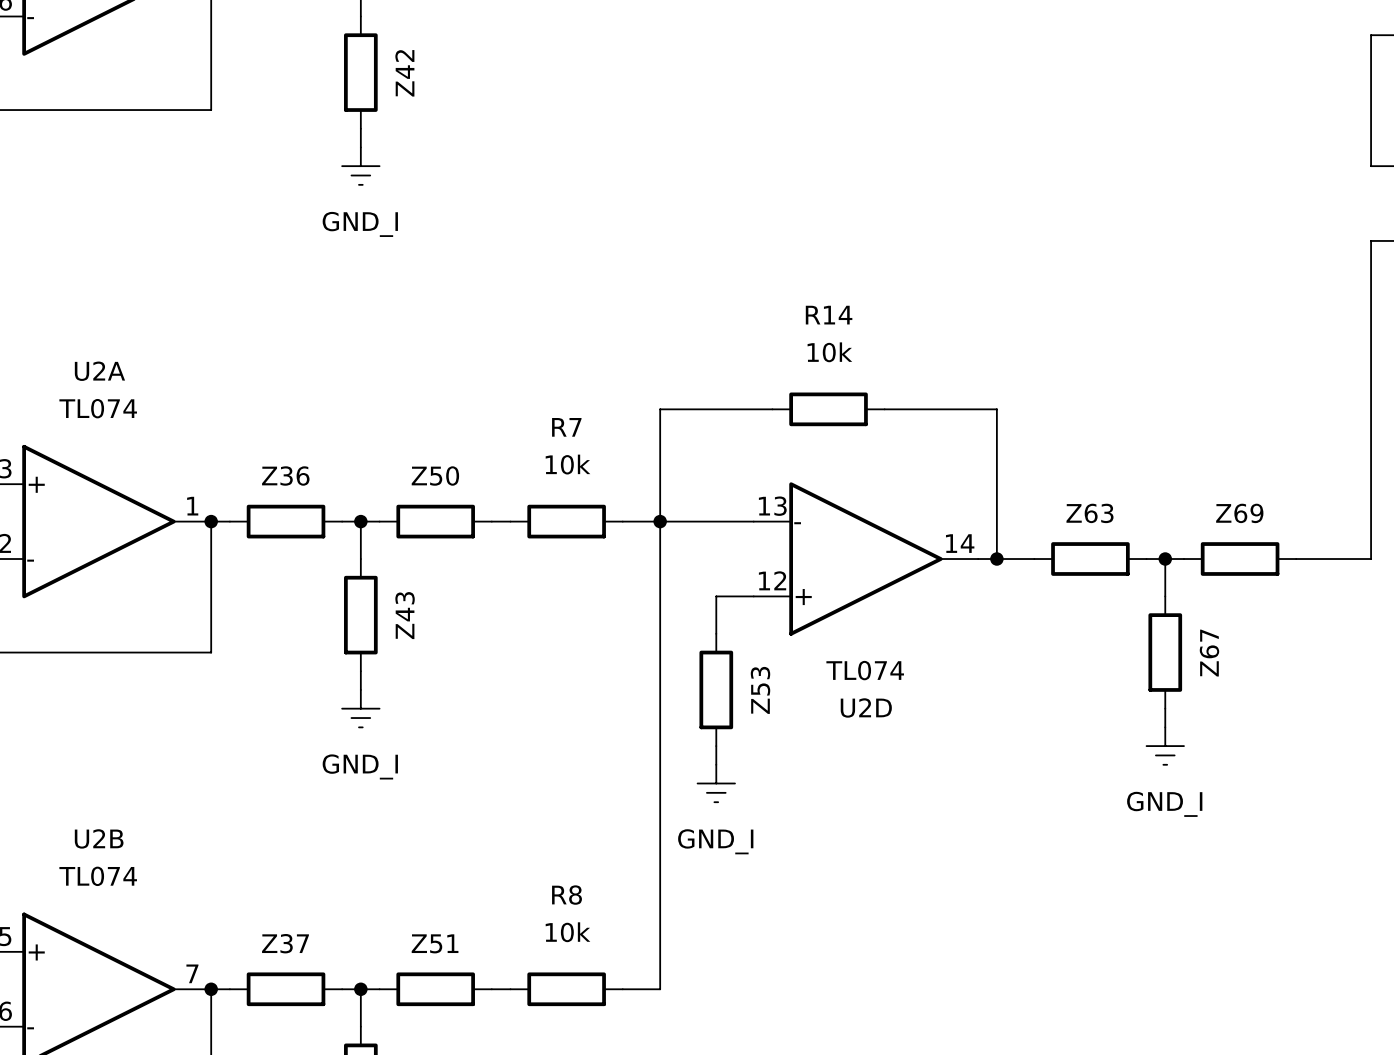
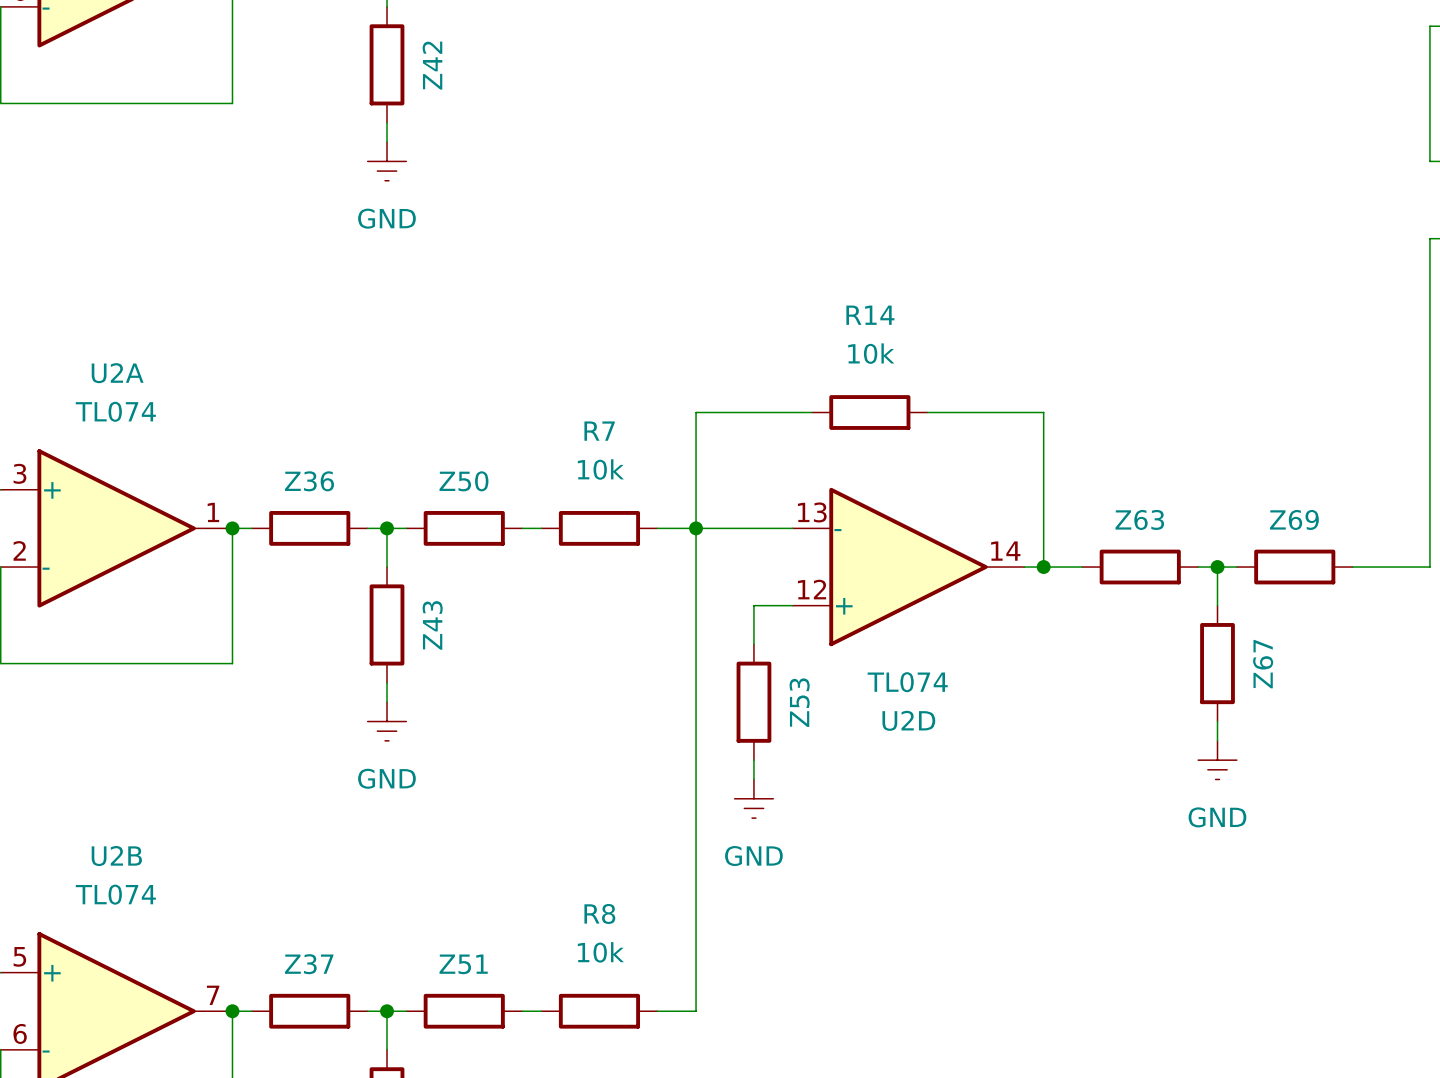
power symbol: GND_I (360, 166) -> GND (387, 161)
power symbol: GND_I (360, 708) -> GND (387, 721)
power symbol: GND_I (1165, 746) -> GND (1217, 760)
power symbol: GND_I (716, 783) -> GND (753, 798)

